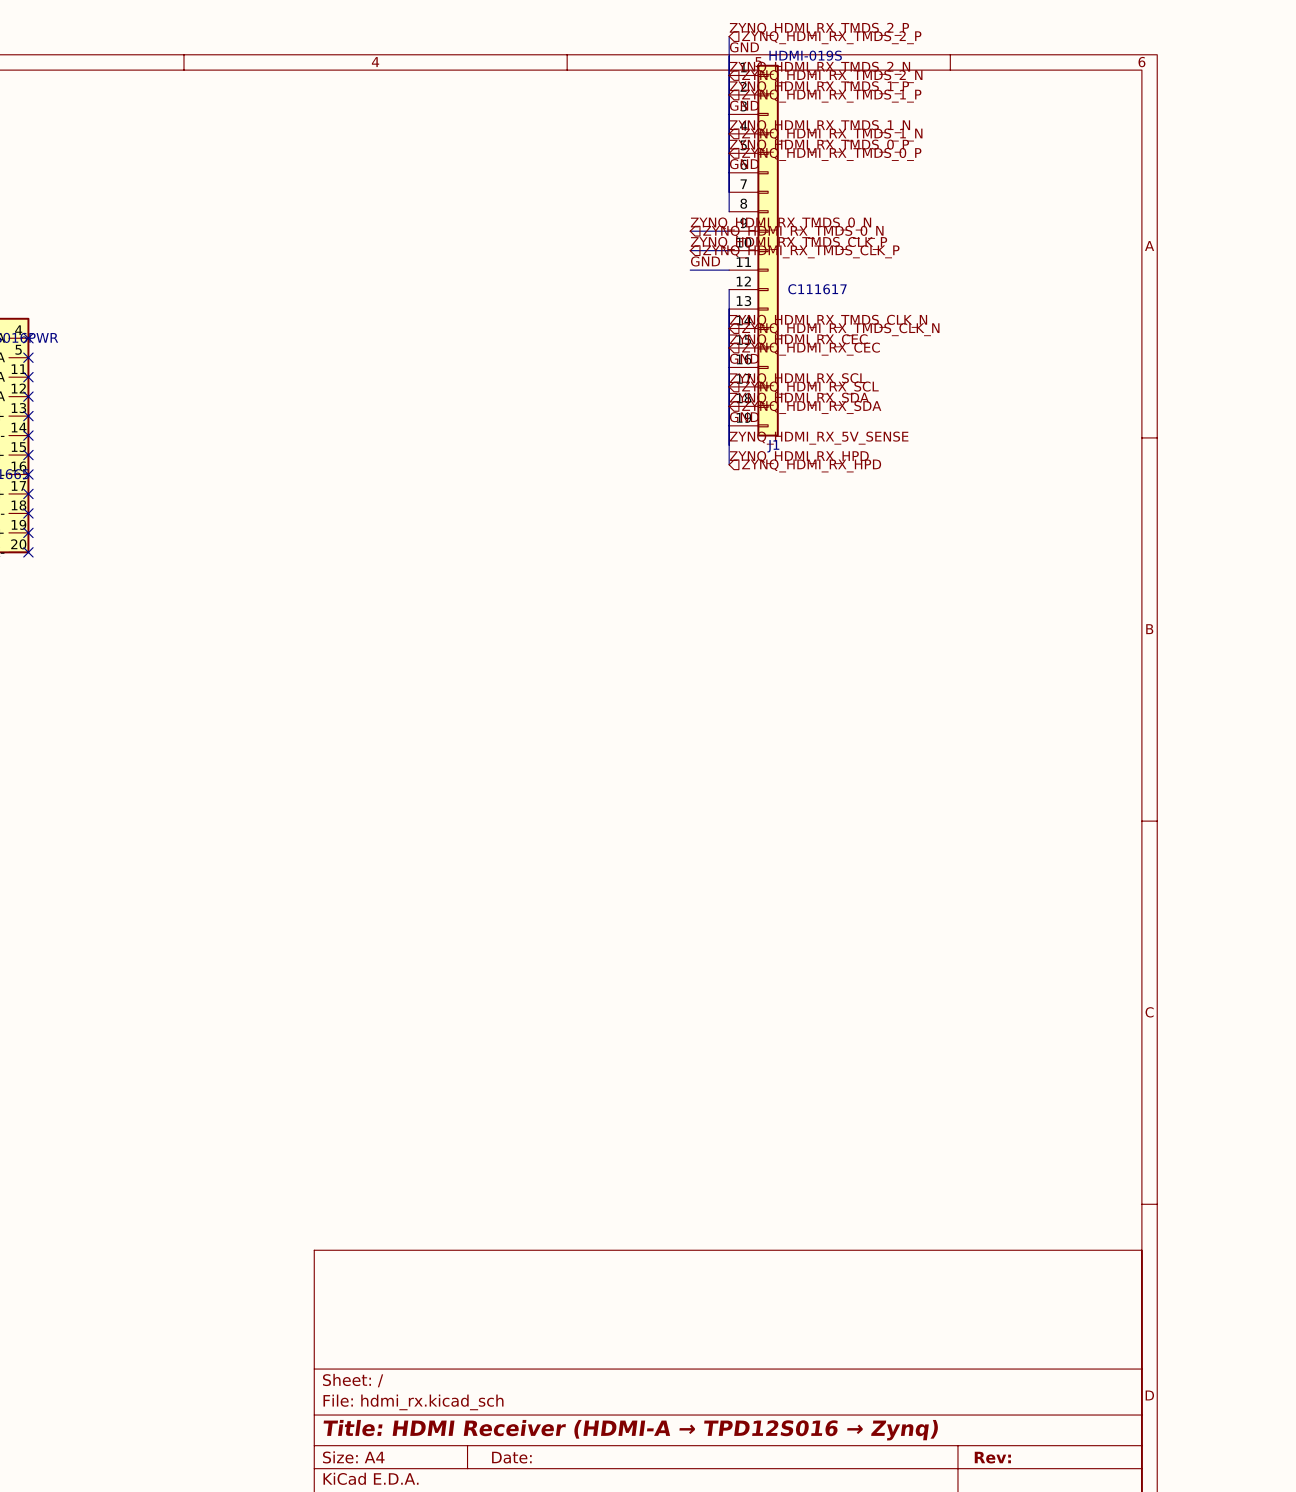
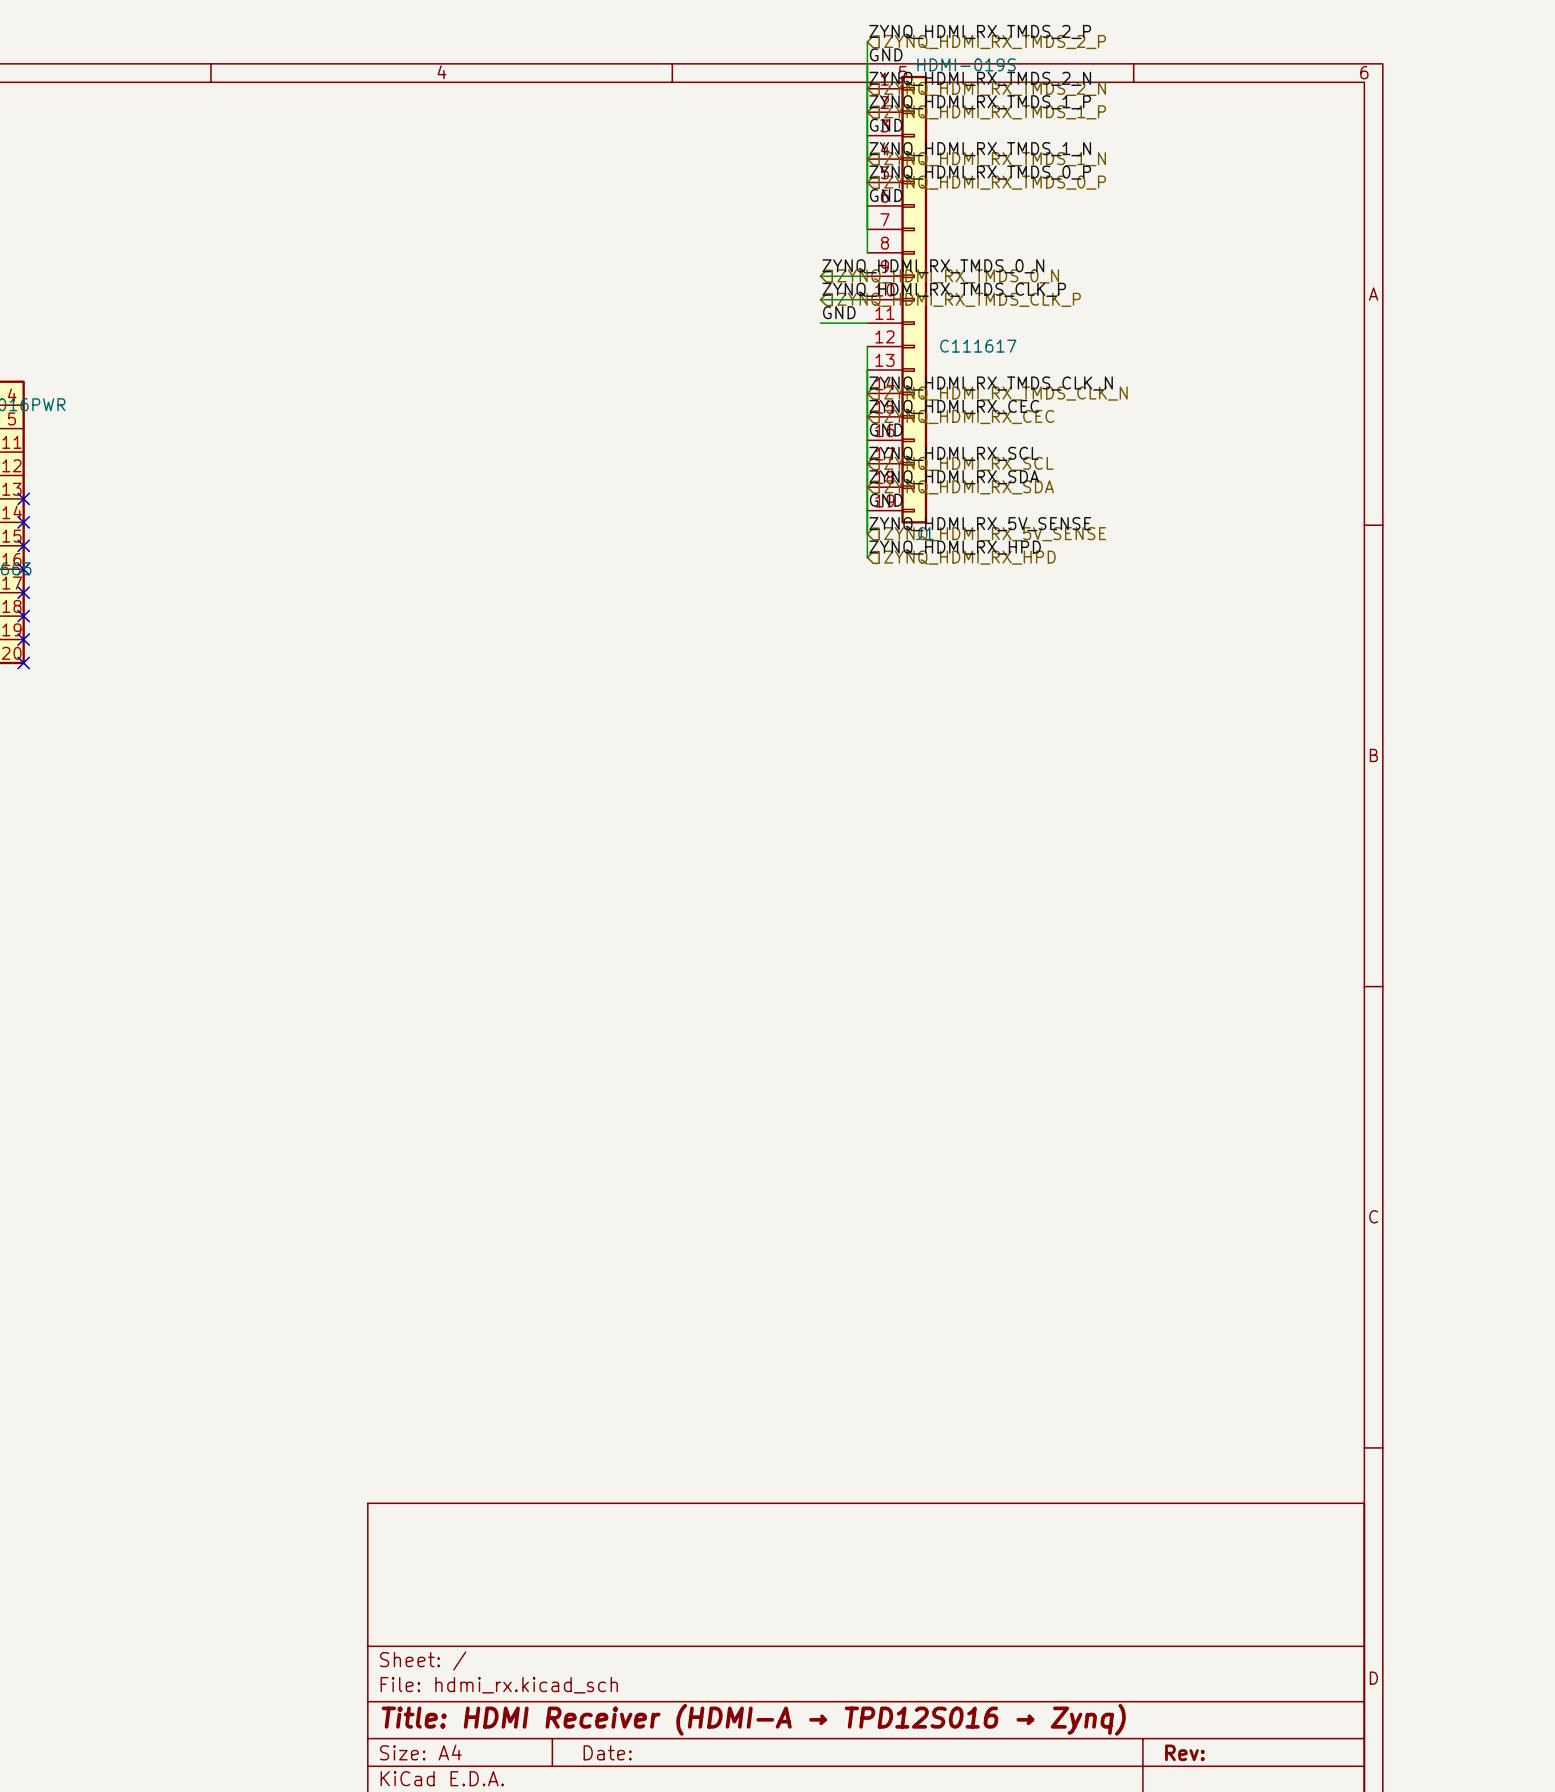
no-connect mark: (28, 338) -> none
no-connect mark: (28, 357) -> none
no-connect mark: (28, 377) -> none
no-connect mark: (28, 396) -> none
hierarchical label: none -> ZYNQ_HDMI_RX_5V_SENSE (995, 534)

